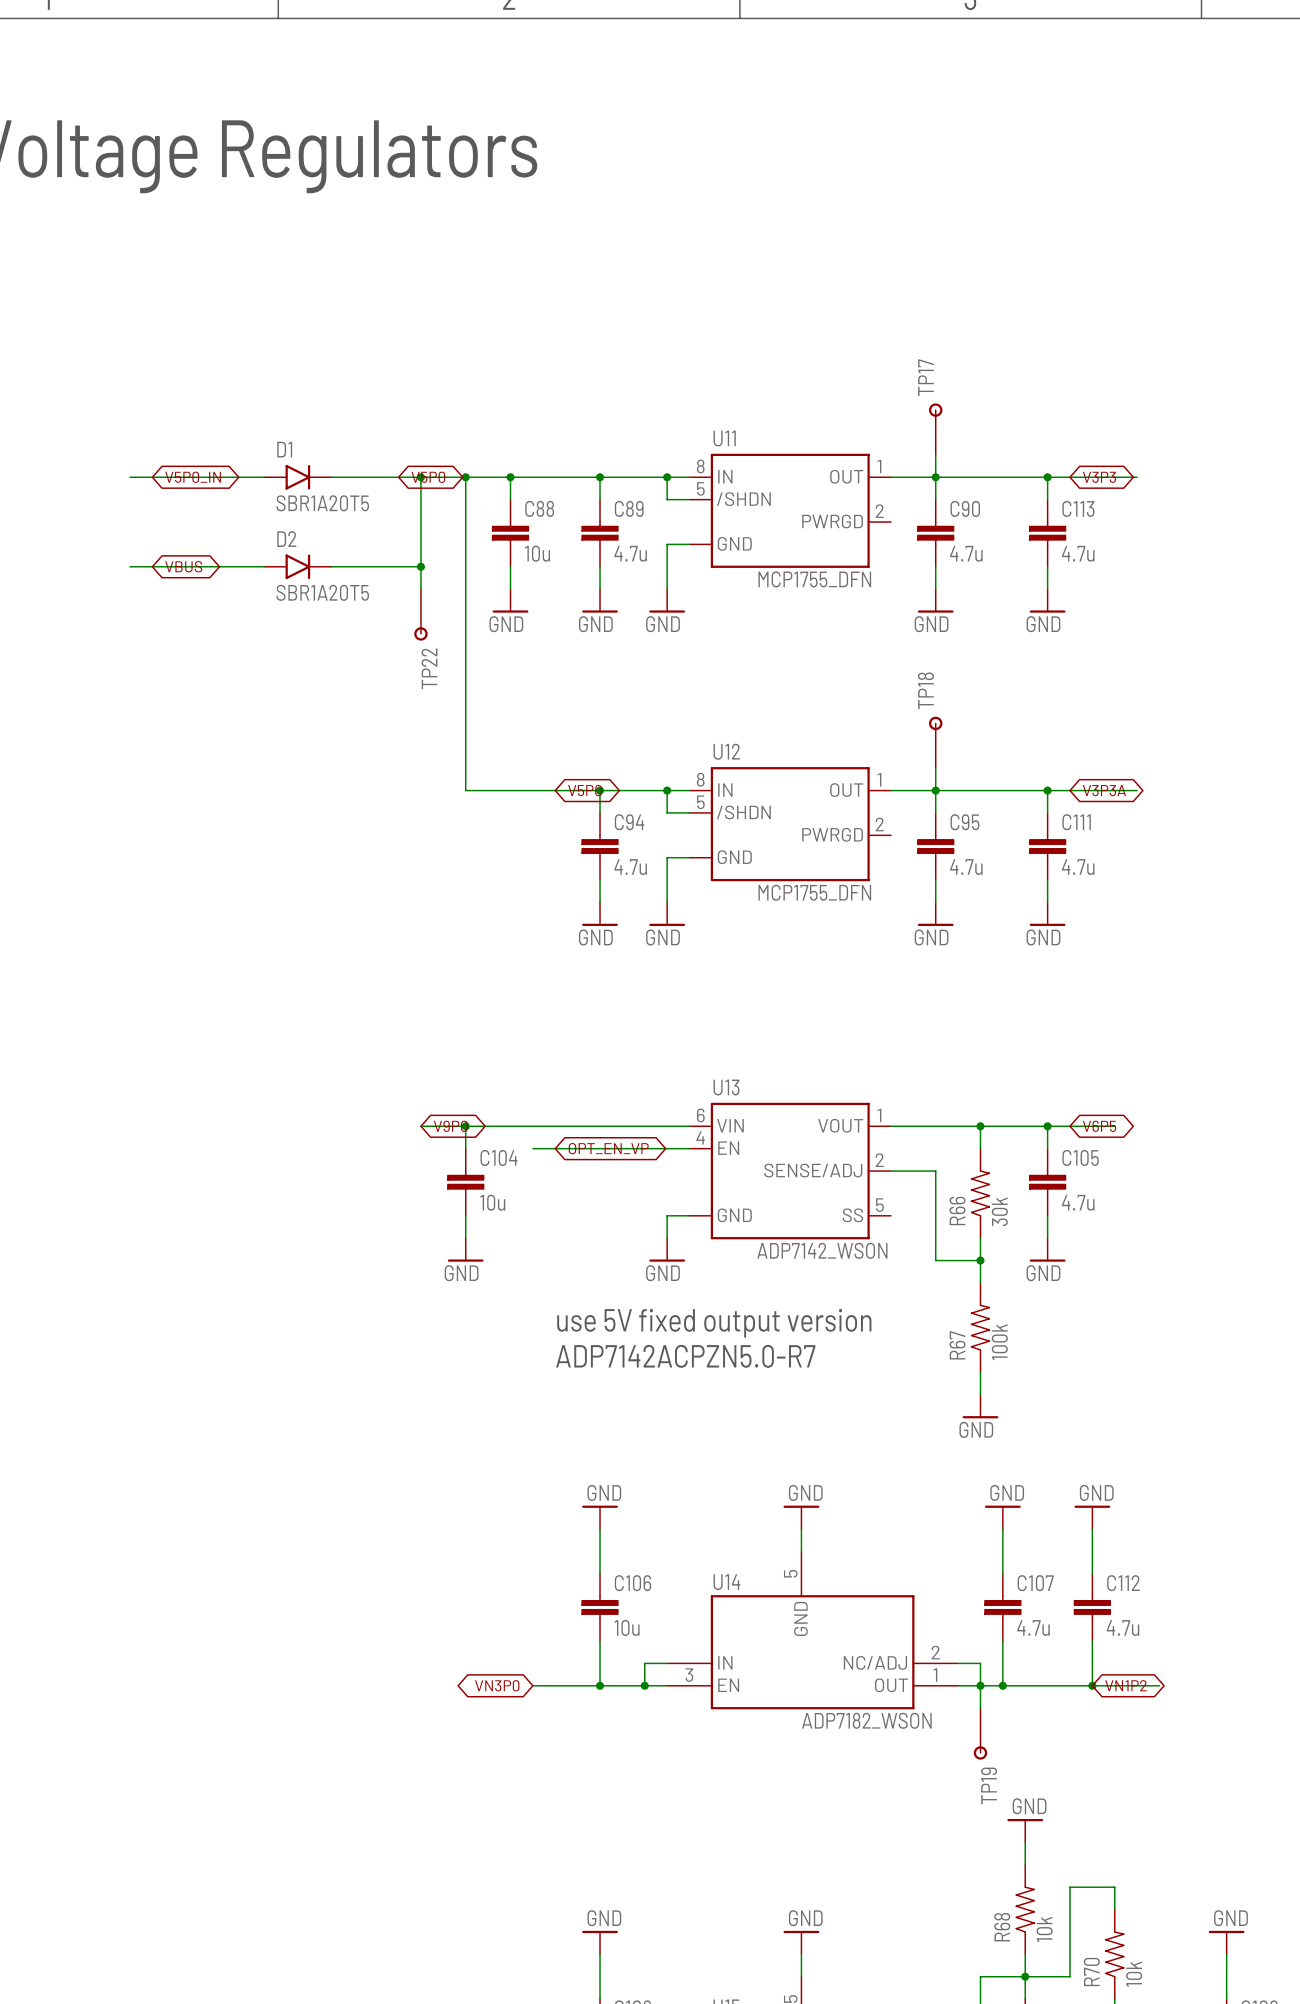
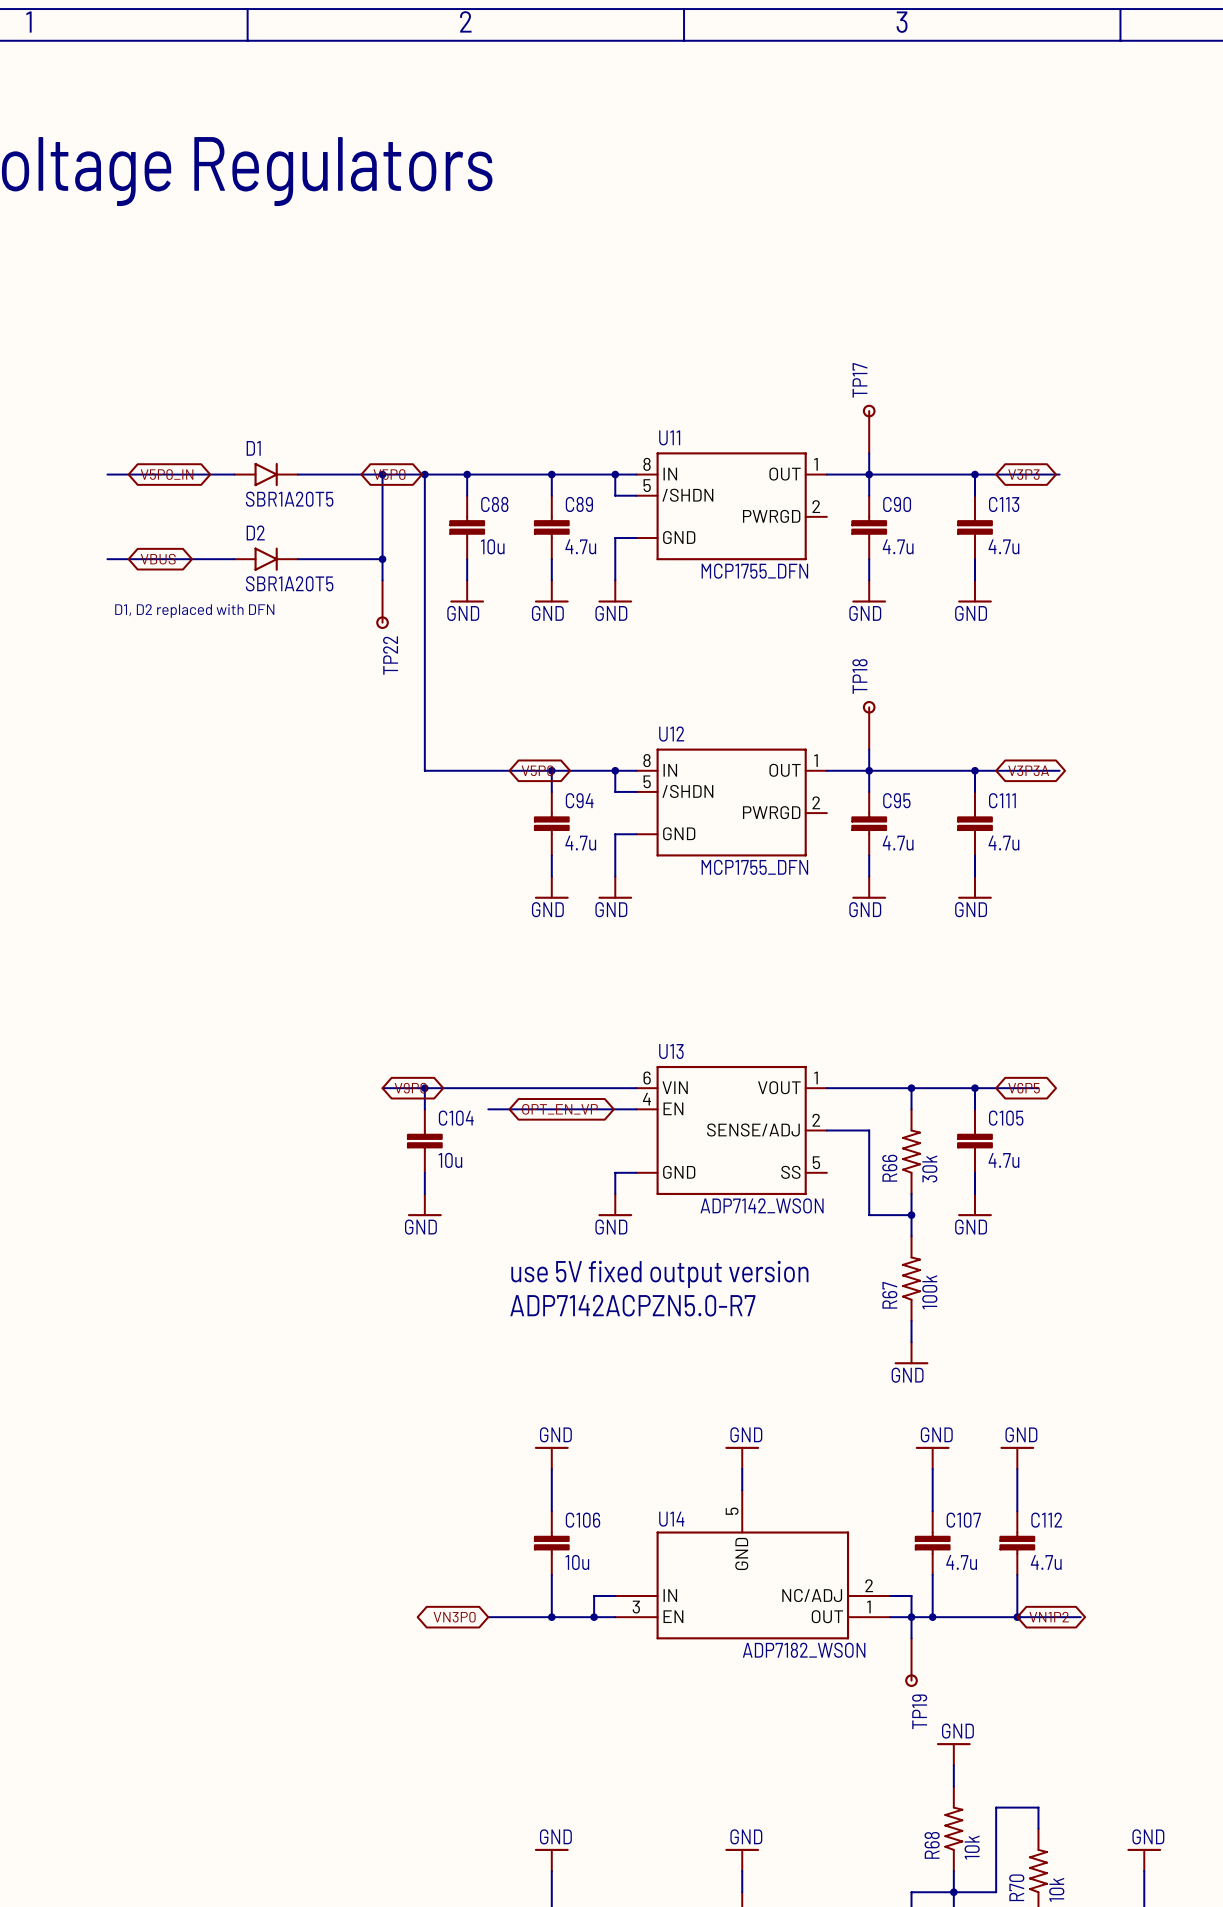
text: none -> D1, D2 replaced with DFN (194, 610)

